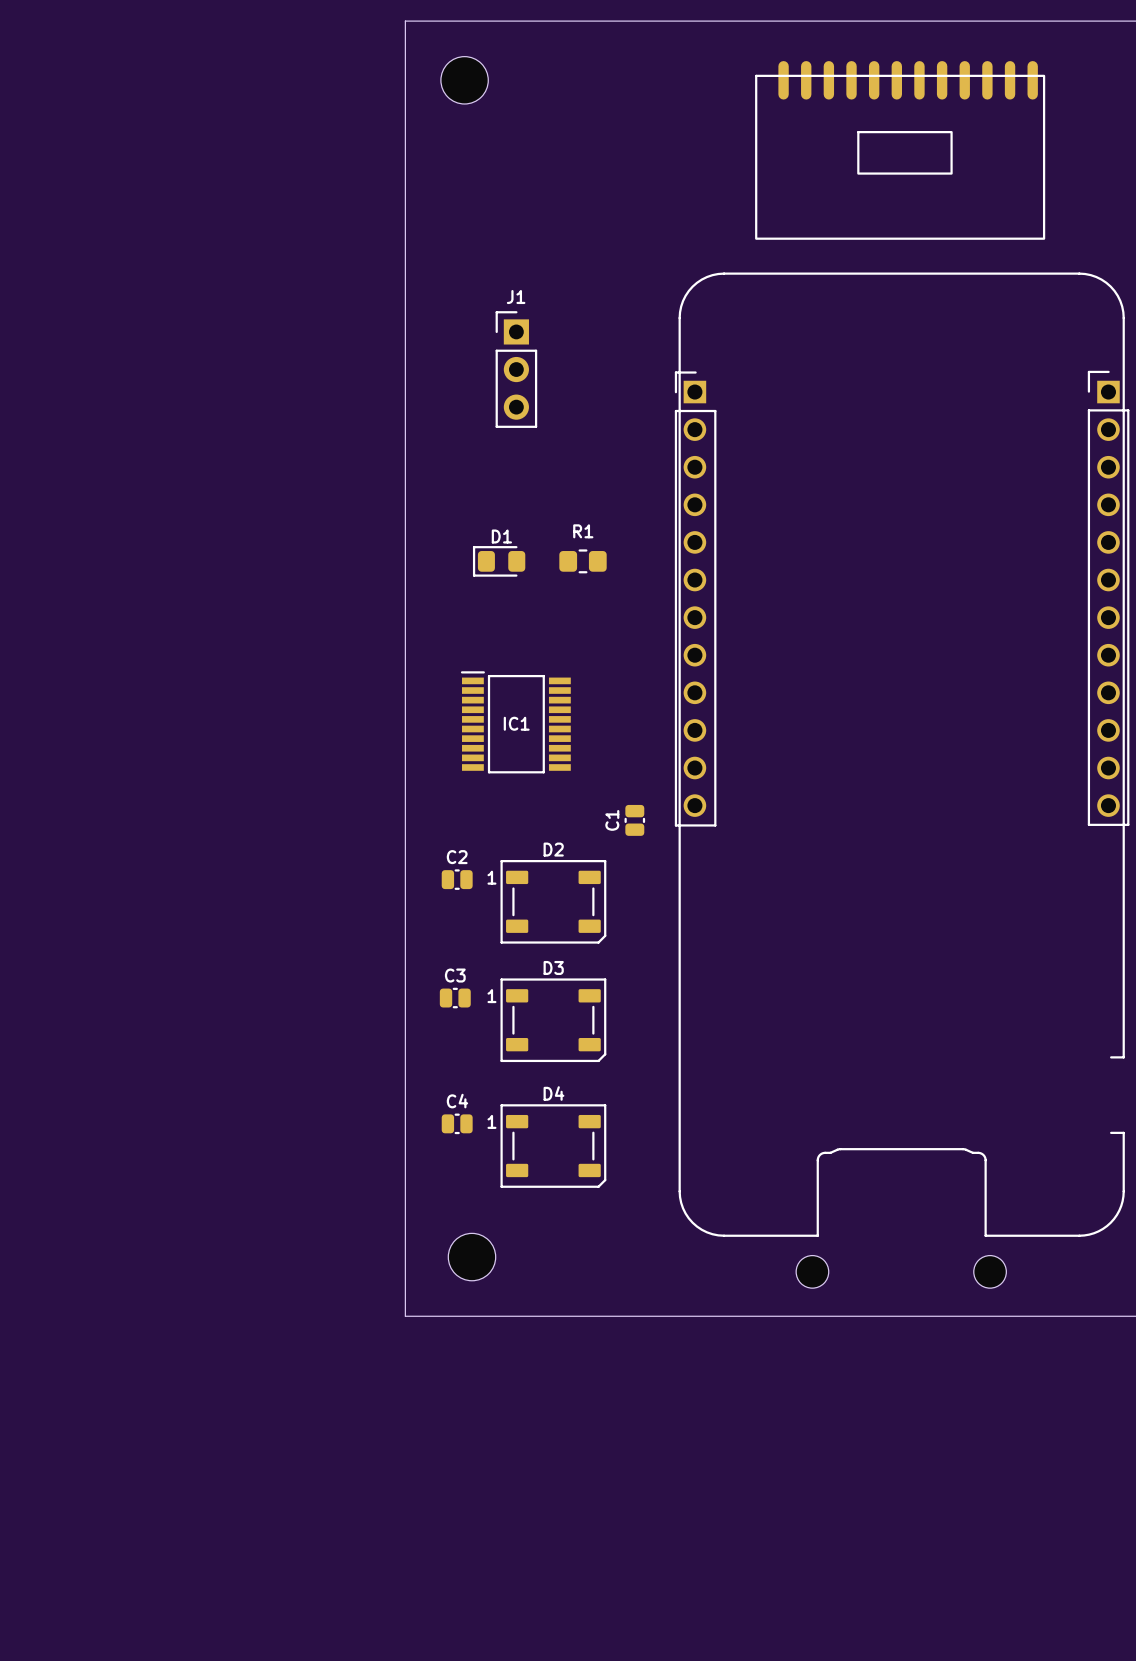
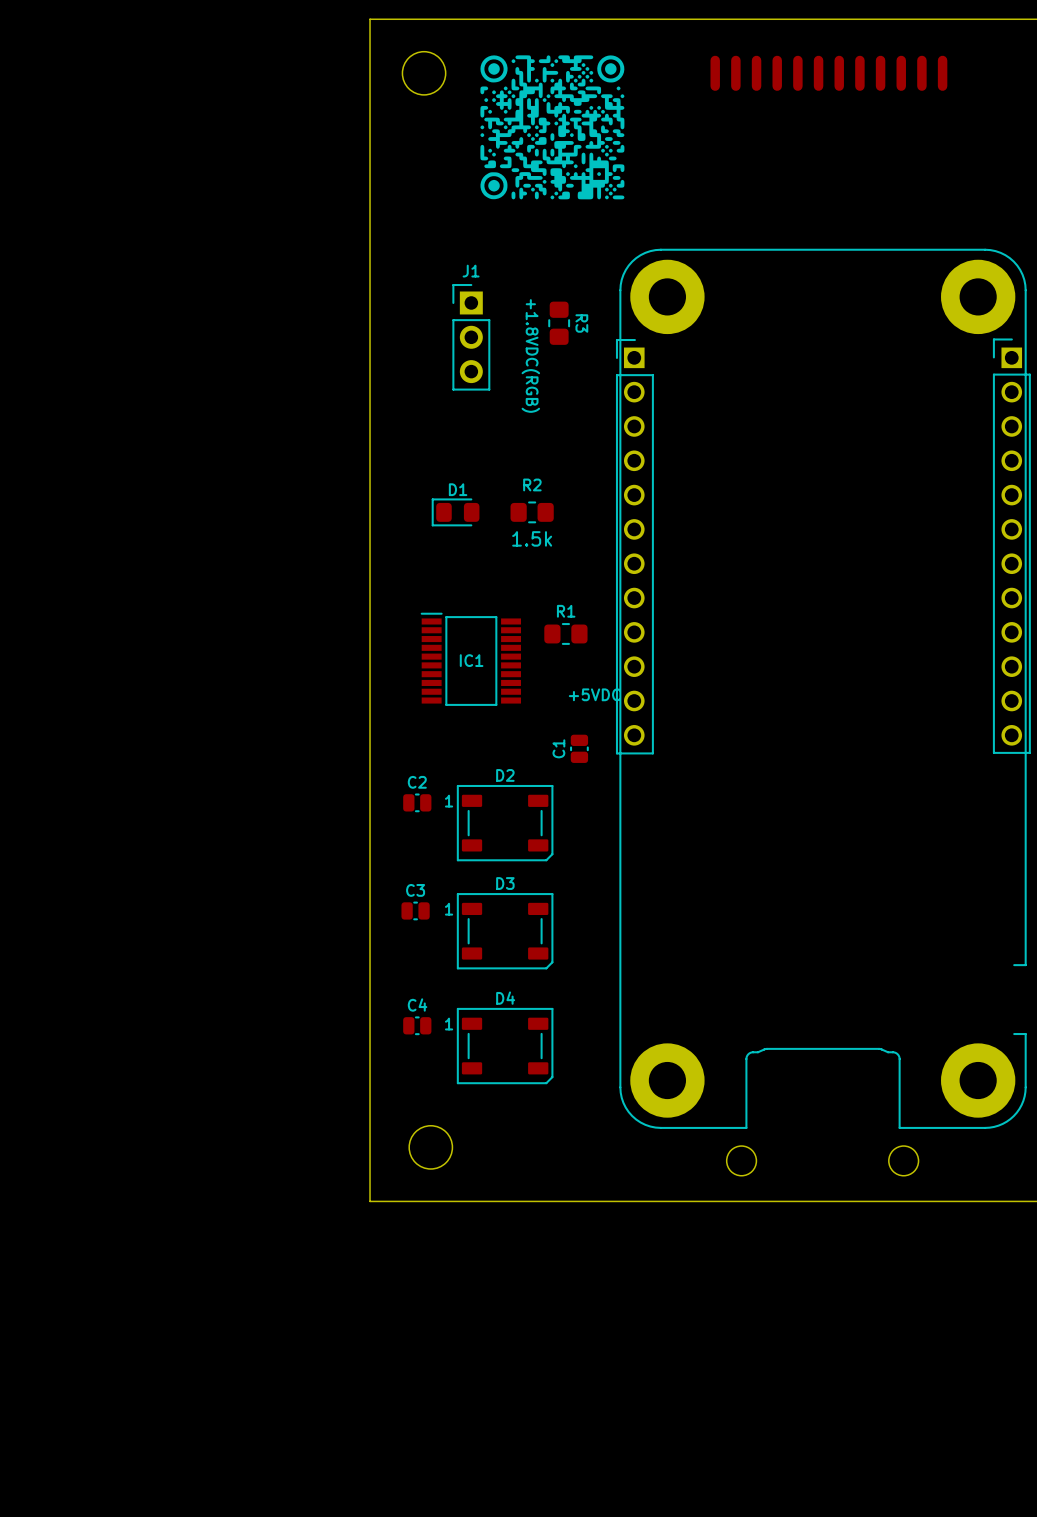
drawing: none -> [480, 55, 625, 200]
part: none -> (828, 73)
part: (900, 150) -> none
part footprint: [674, 272, 1130, 1237] -> [615, 248, 1031, 1129]
R3: none -> (559, 323)
text: none -> +1.8VDC(RGB) (530, 355)
R1 name: R1 (583, 531) -> R2 (532, 484)
R1 value: none -> 1.5k (532, 538)
R1: none -> (565, 633)
text: none -> +5VDC (594, 694)

